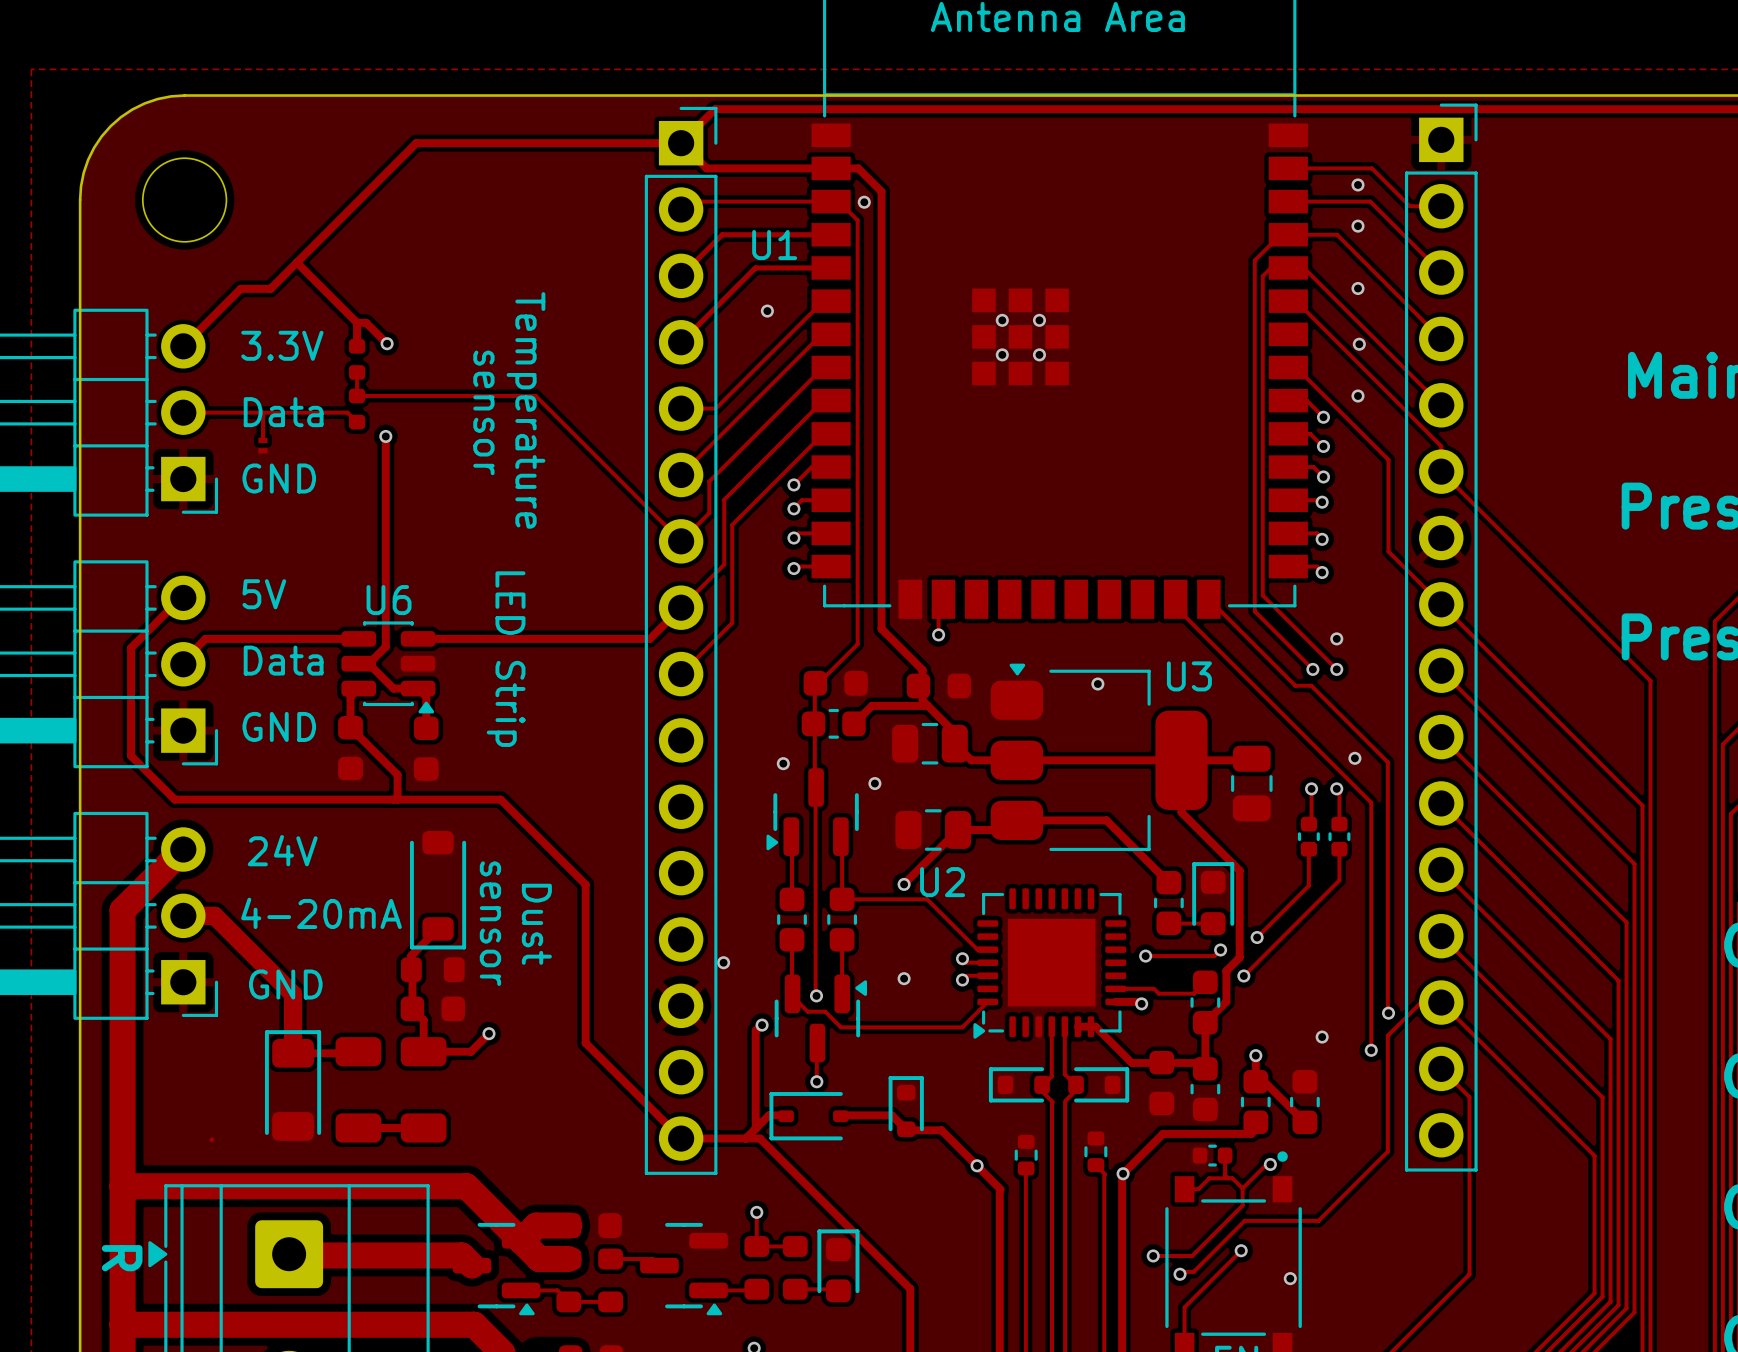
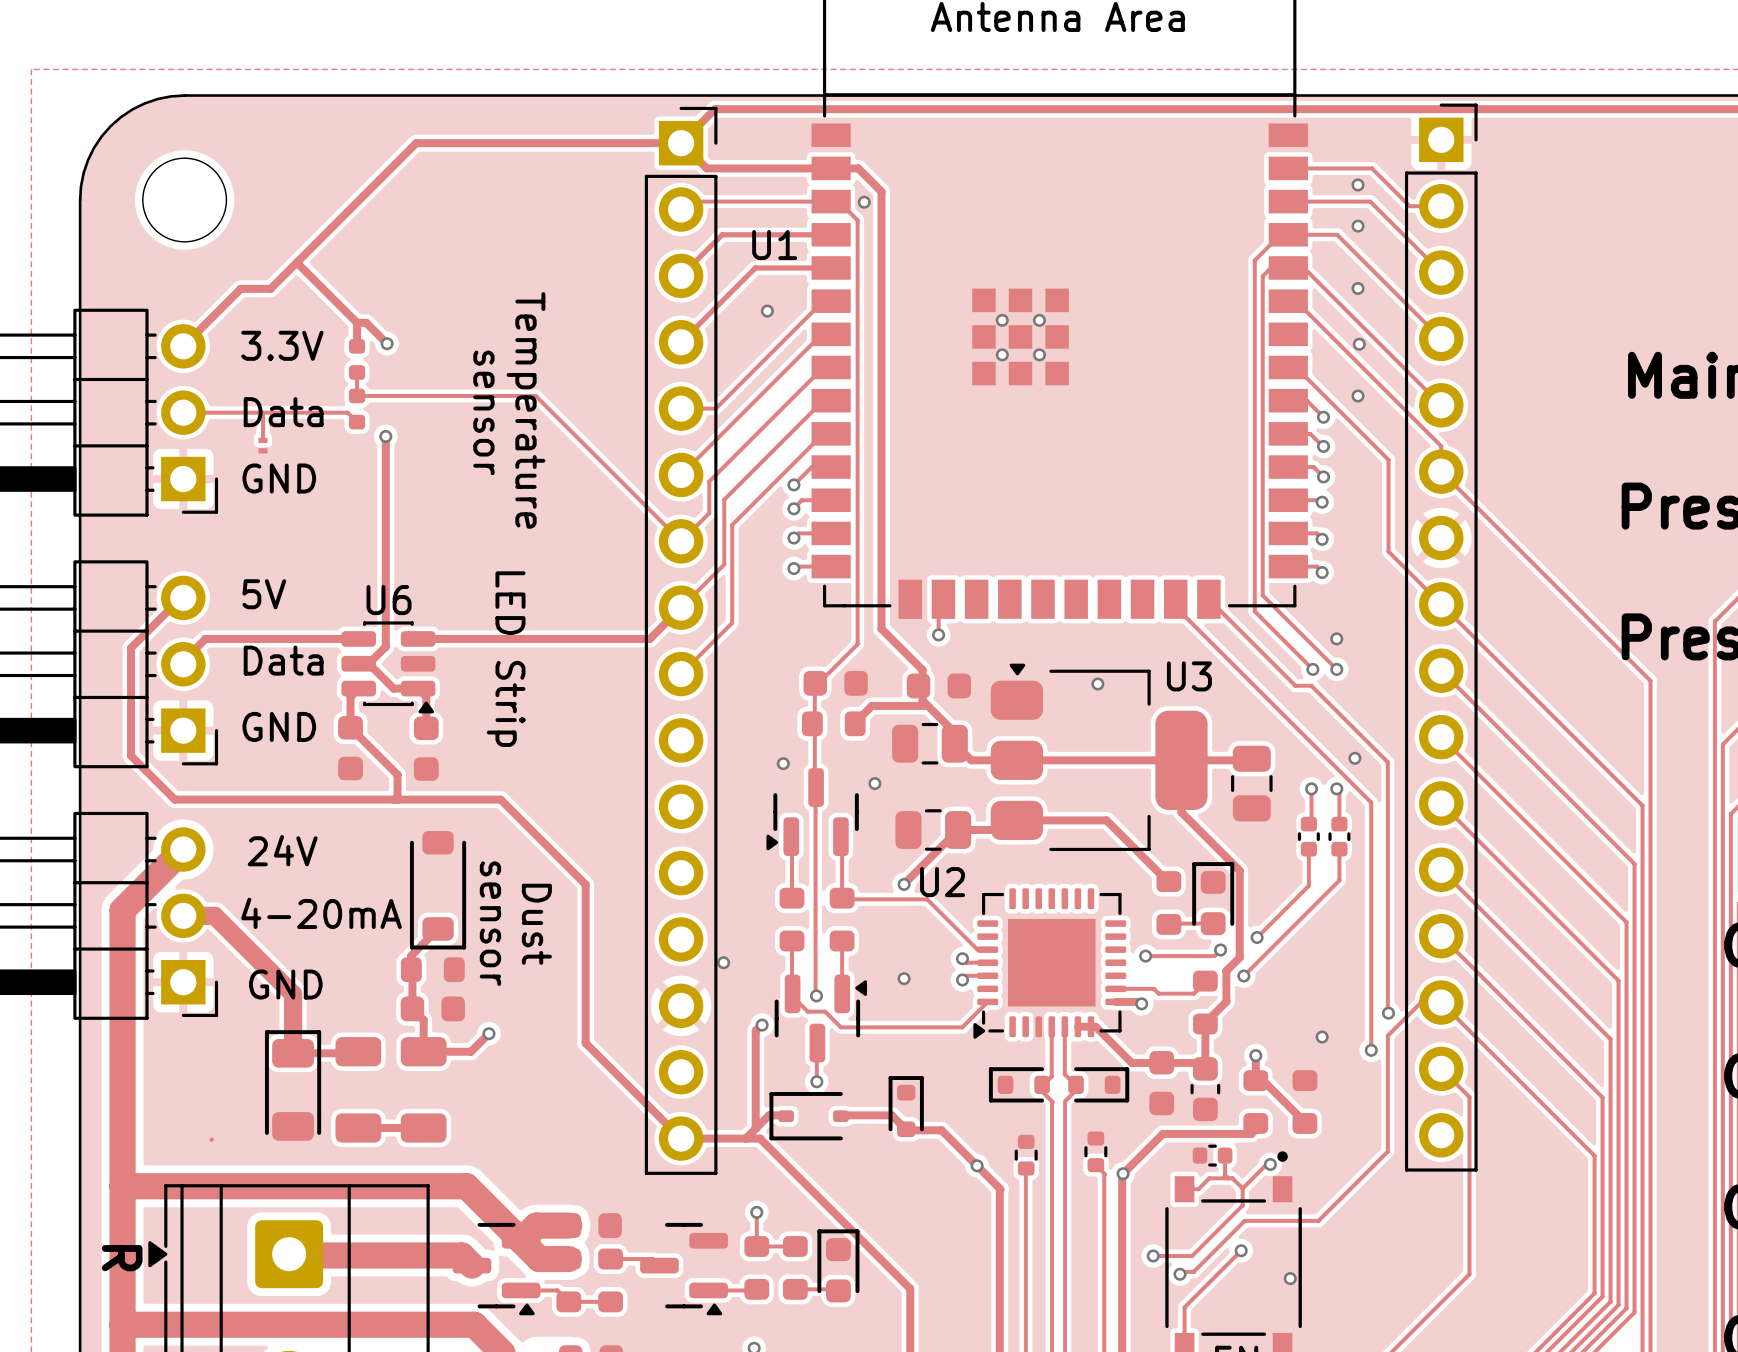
part footprint: [801, 708, 866, 739] -> [801, 711, 866, 737]
part footprint: [1153, 870, 1184, 936] -> [1156, 871, 1182, 935]
part footprint: [777, 887, 807, 952] -> [779, 887, 805, 952]
part footprint: [827, 887, 858, 952] -> [829, 887, 855, 952]
part footprint: [1190, 970, 1221, 1035] -> [1192, 970, 1218, 1035]
part footprint: [1240, 1070, 1271, 1135] -> [1243, 1070, 1269, 1134]
part footprint: [1290, 1070, 1320, 1135] -> [1292, 1070, 1318, 1134]

